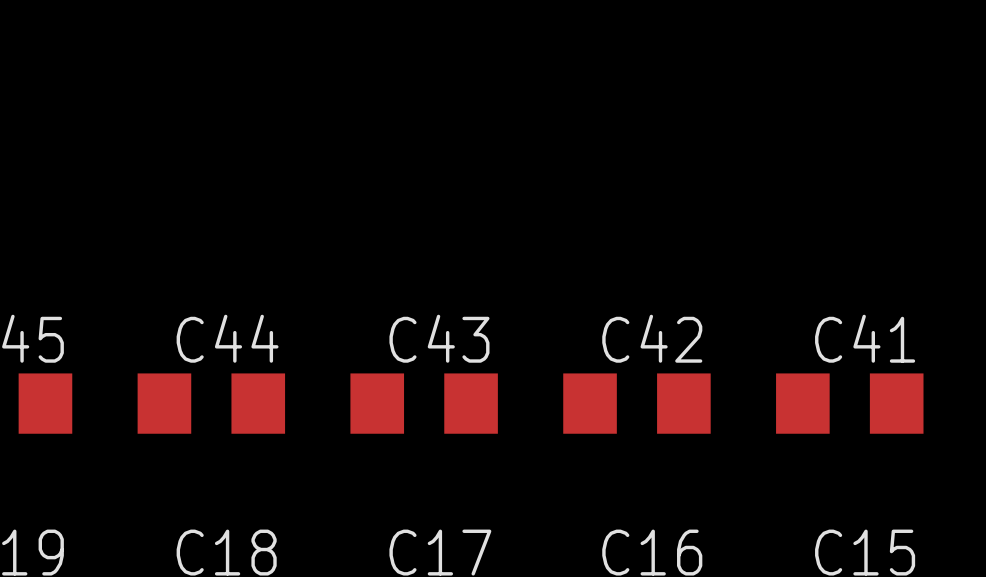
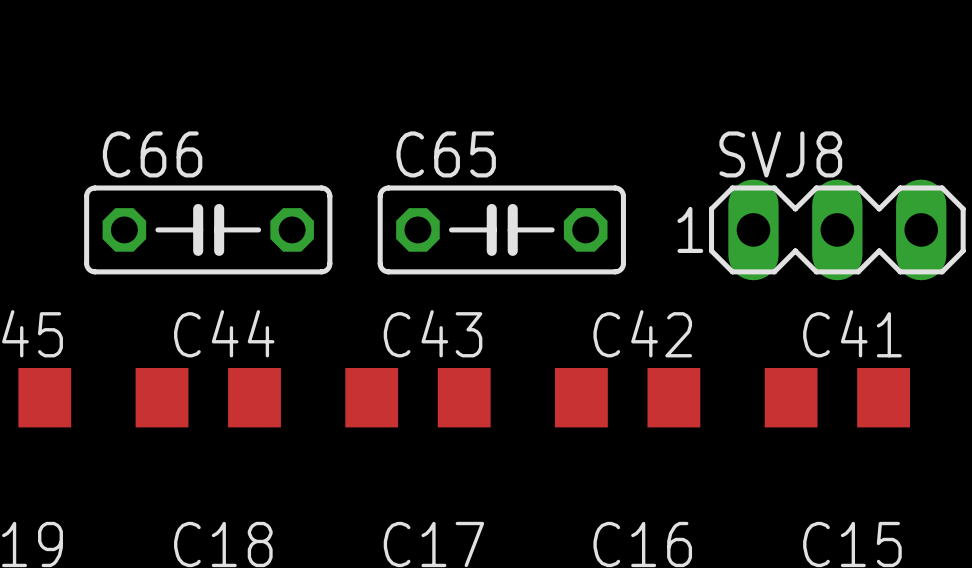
C66: none -> (208, 229)
C65: none -> (501, 229)
SVJ8: none -> (837, 229)

